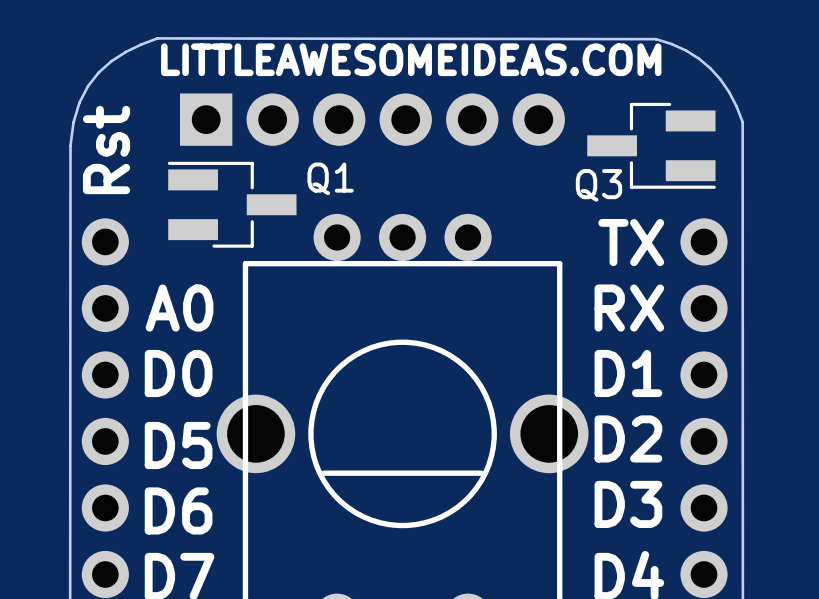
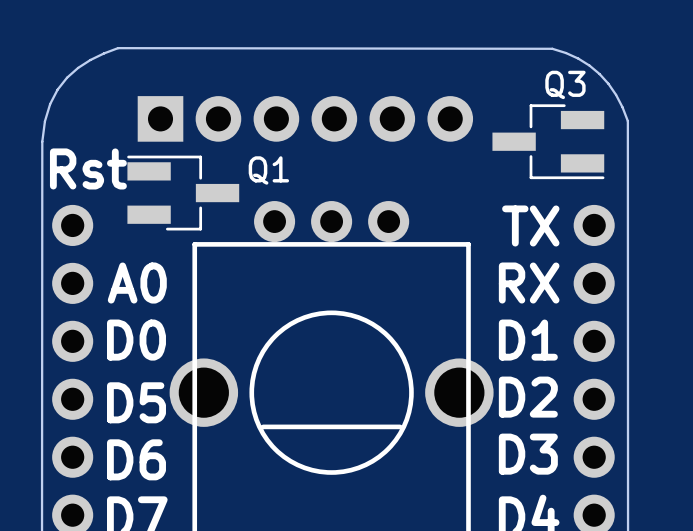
text: LITTLEAWESOMEIDEAS.COM (411, 59) -> none
text rotation: 0° (106, 150) -> 90° clockwise (88, 168)
Q3 name position: Q3 (598, 185) -> Q3 (565, 84)

